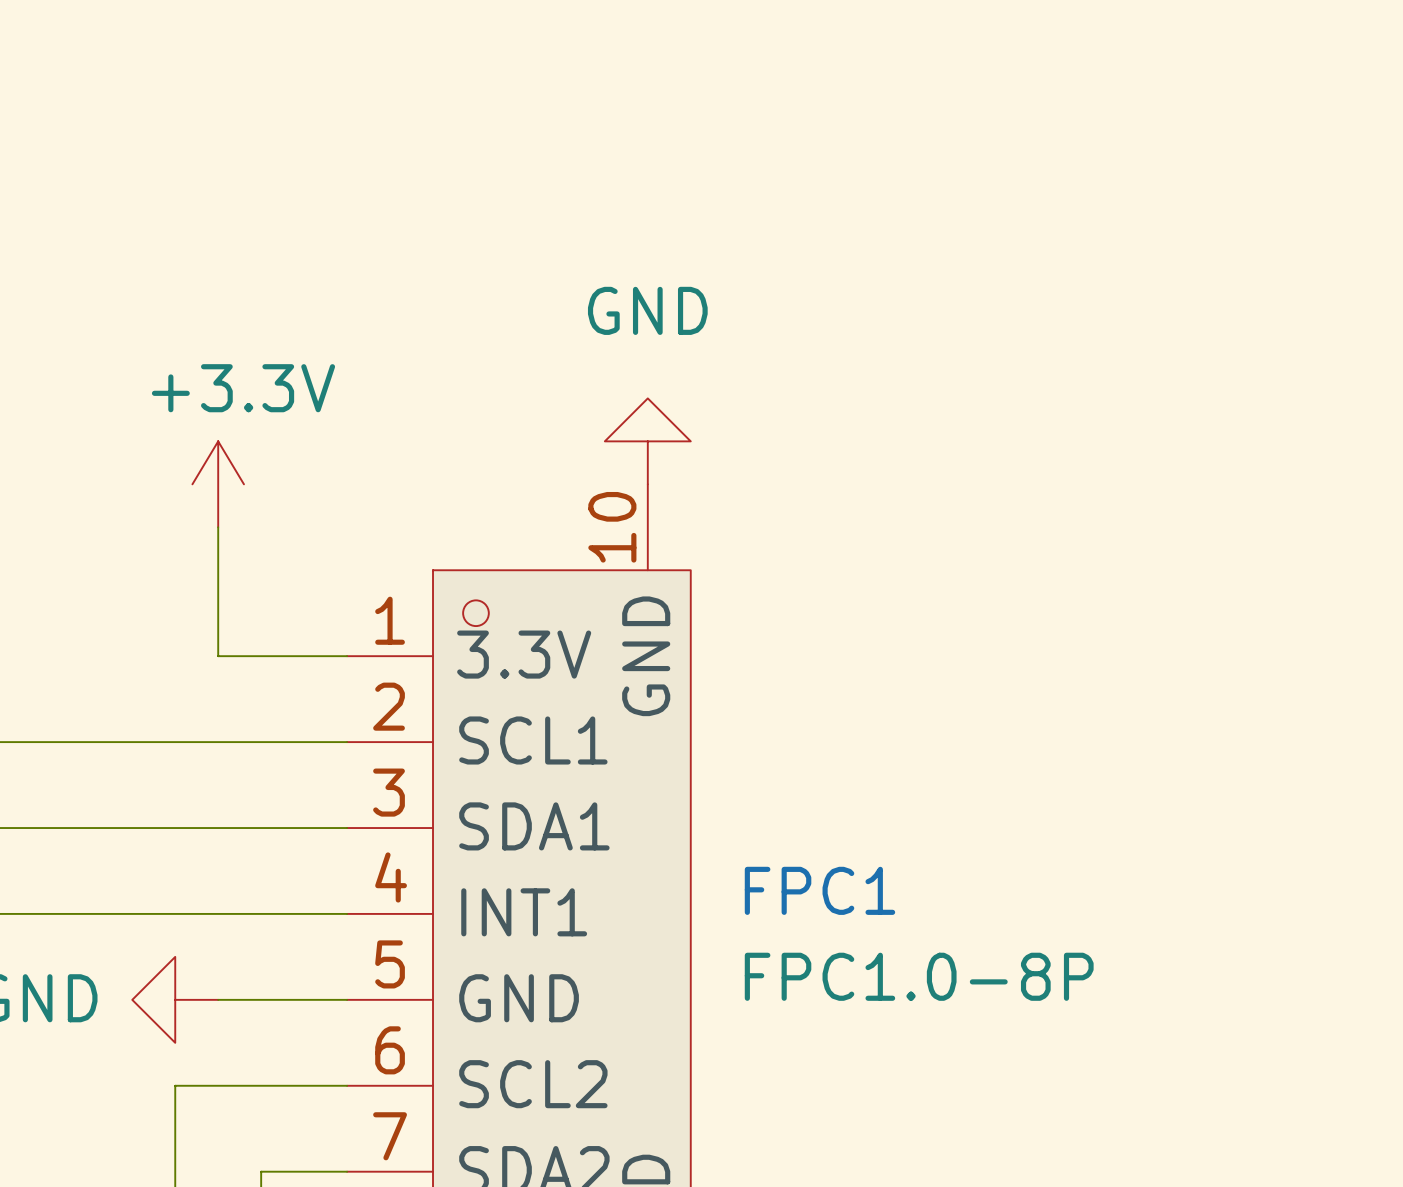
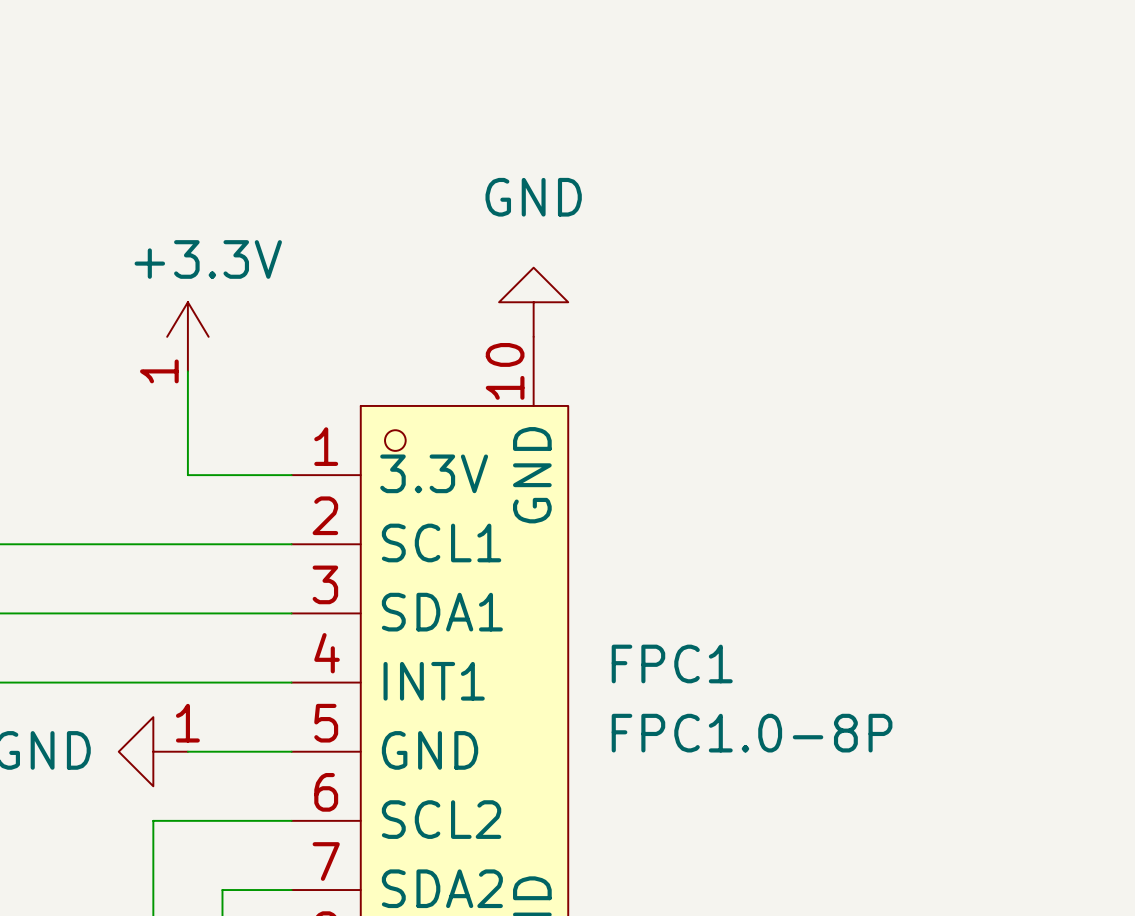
power symbol pin number: none -> 1 (159, 371)
power symbol pin number: none -> 1 (187, 723)

